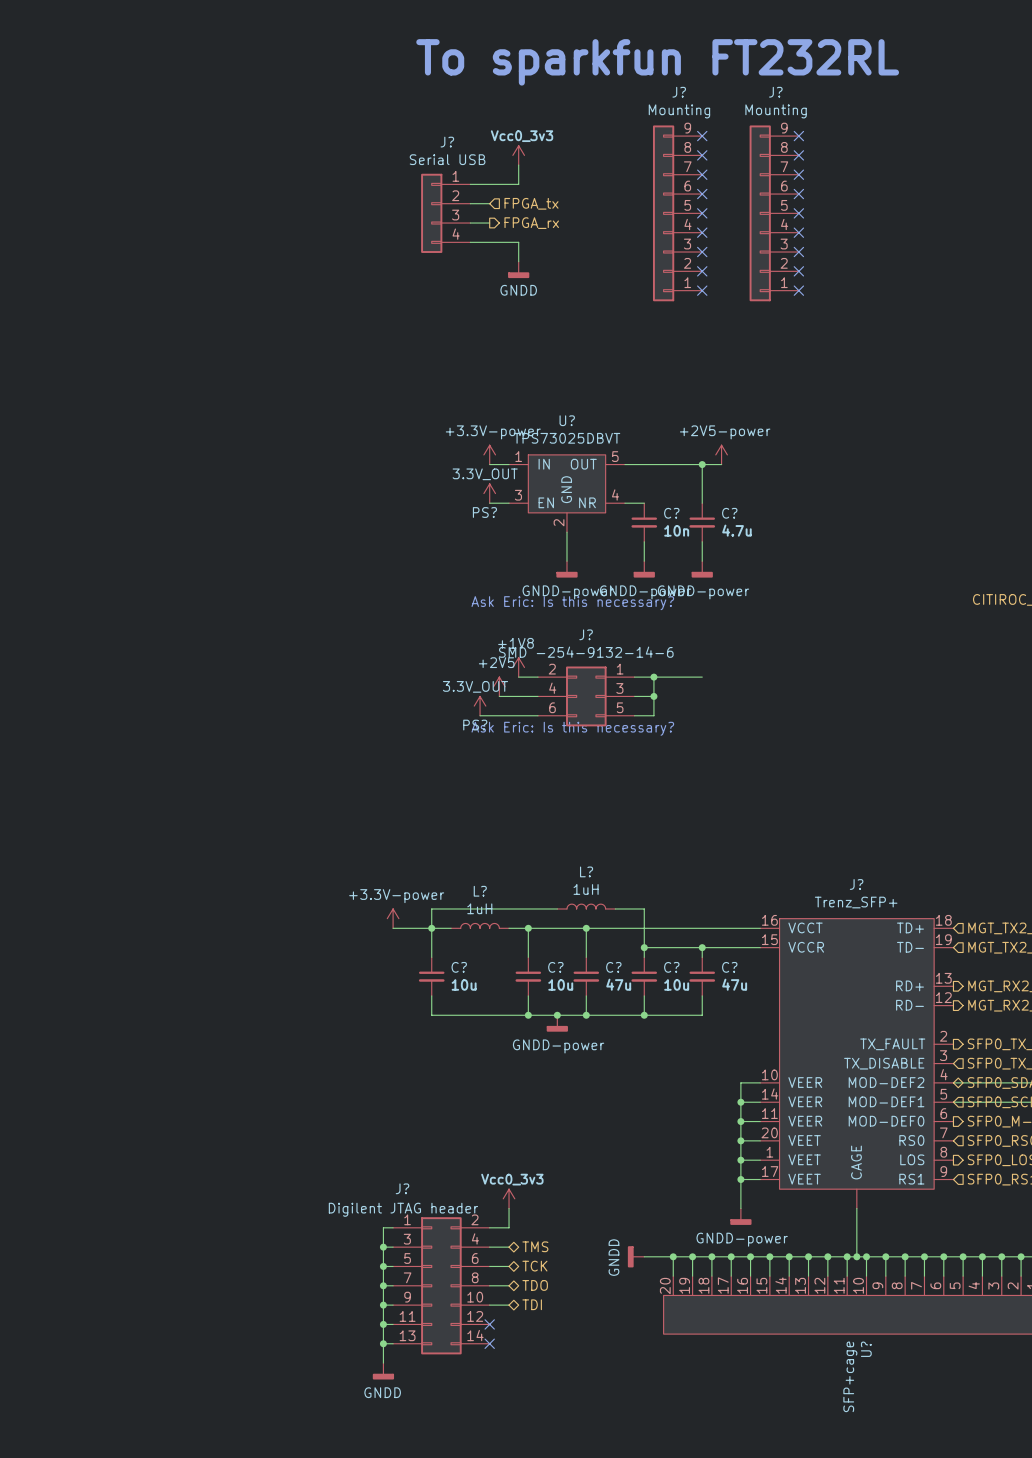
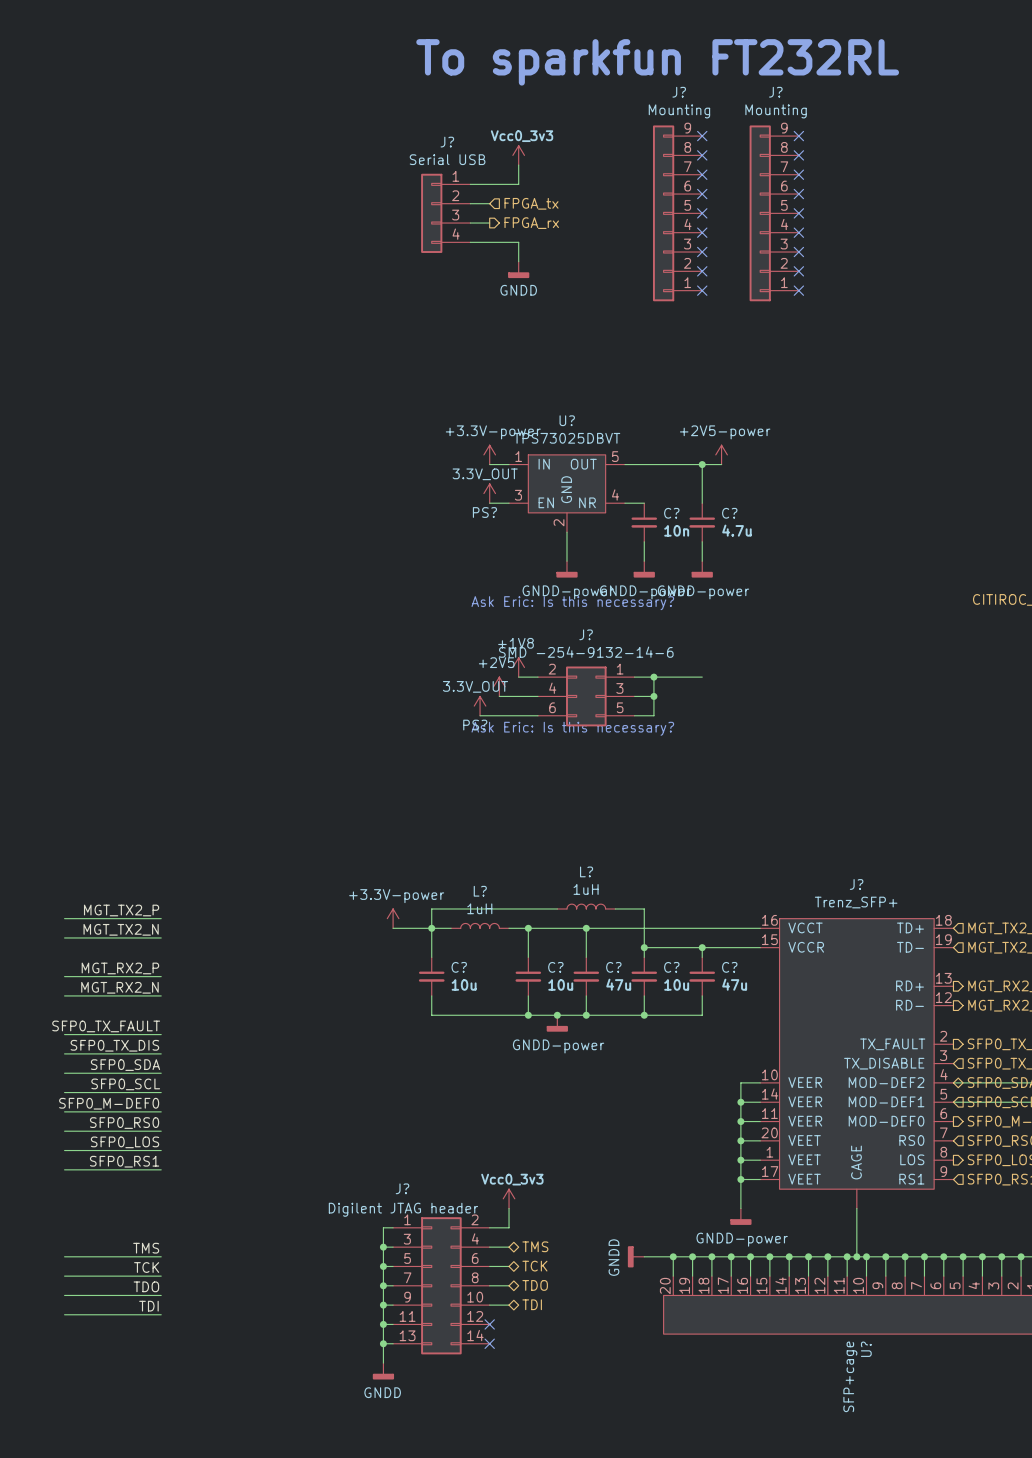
label: none -> MGT_TX2_P (121, 910)
wire: none -> (64, 918) (161, 918)
label: none -> MGT_TX2_N (121, 929)
wire: none -> (64, 937) (161, 937)
label: none -> MGT_RX2_P (120, 968)
wire: none -> (64, 976) (161, 976)
label: none -> MGT_RX2_N (119, 987)
wire: none -> (64, 995) (161, 995)
label: none -> SFP0_TX_FAULT (106, 1026)
wire: none -> (64, 1034) (161, 1034)
label: none -> SFP0_TX_DIS (114, 1045)
wire: none -> (64, 1053) (161, 1053)
label: none -> SFP0_SDA (125, 1065)
wire: none -> (64, 1073) (161, 1073)
label: none -> SFP0_SCL (125, 1084)
wire: none -> (64, 1092) (161, 1092)
label: none -> SFP0_M-DEF0 (109, 1103)
wire: none -> (64, 1111) (161, 1111)
label: none -> SFP0_RS0 (124, 1123)
wire: none -> (64, 1131) (161, 1131)
label: none -> SFP0_LOS (125, 1142)
wire: none -> (64, 1150) (161, 1150)
label: none -> SFP0_RS1 (124, 1161)
wire: none -> (64, 1169) (161, 1169)
label: none -> TMS (146, 1248)
wire: none -> (64, 1256) (161, 1256)
label: none -> TCK (146, 1267)
wire: none -> (64, 1276) (161, 1276)
label: none -> TDO (146, 1286)
wire: none -> (64, 1295) (161, 1295)
label: none -> TDI (148, 1306)
wire: none -> (64, 1314) (161, 1314)

